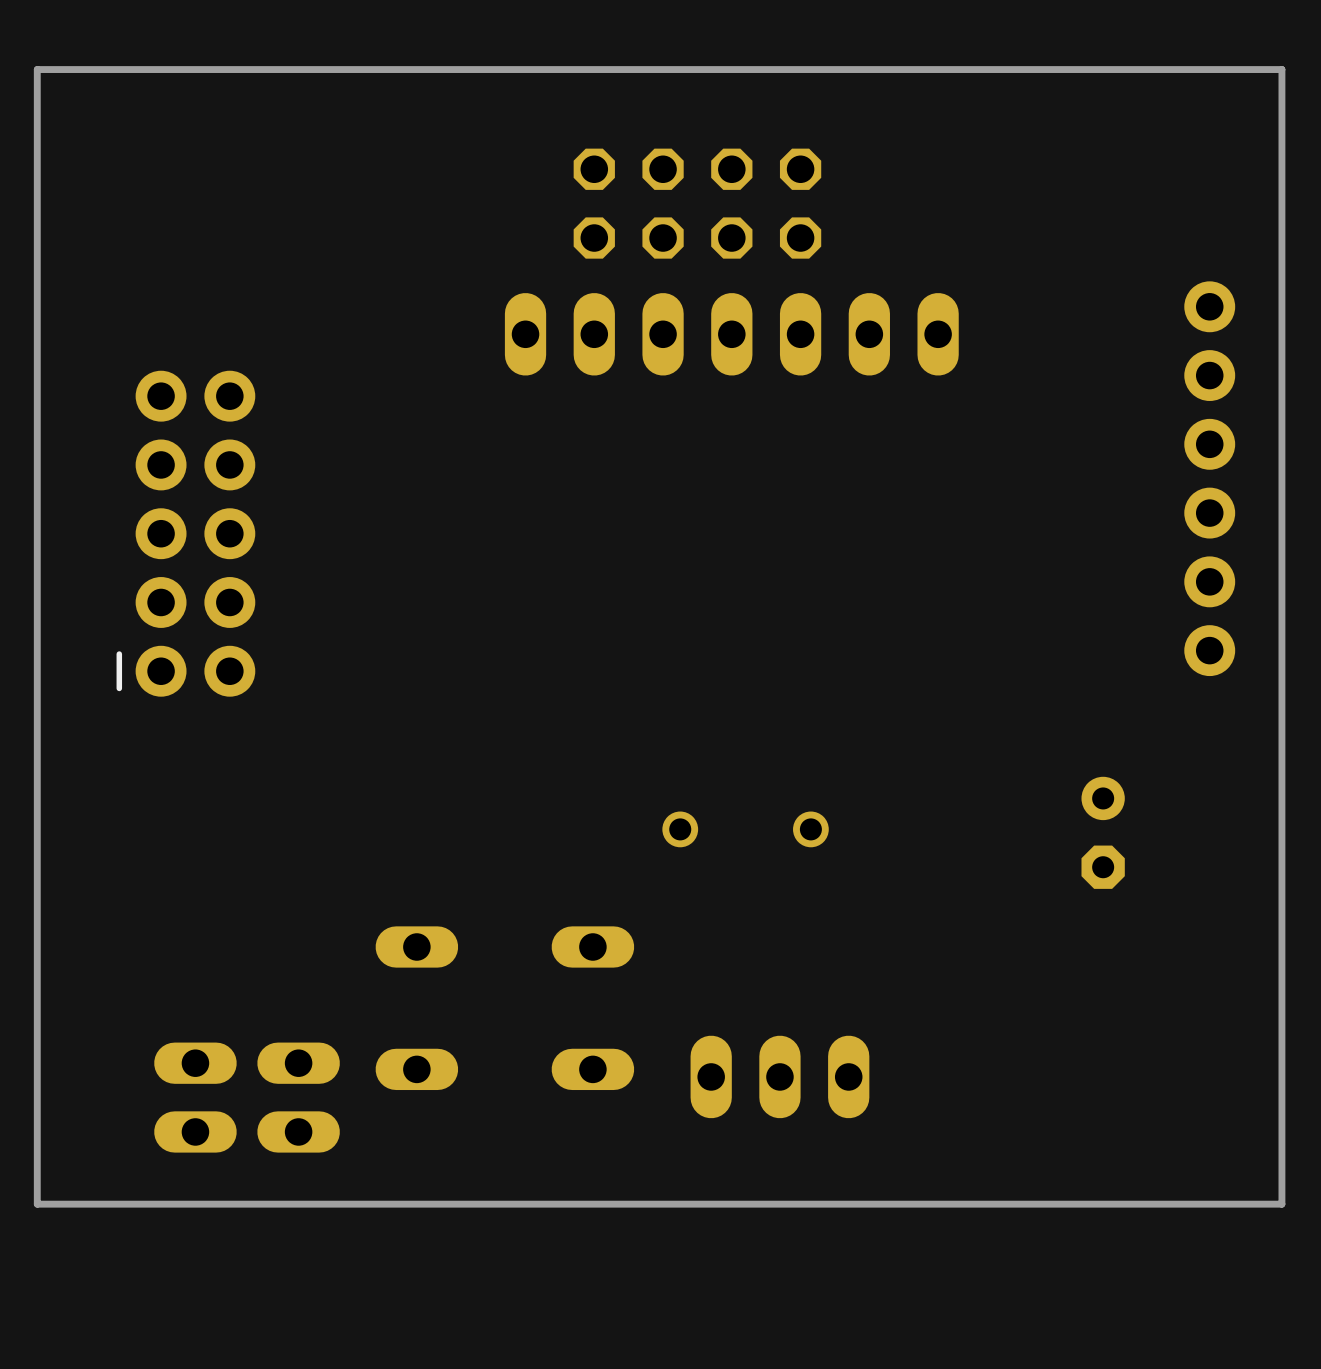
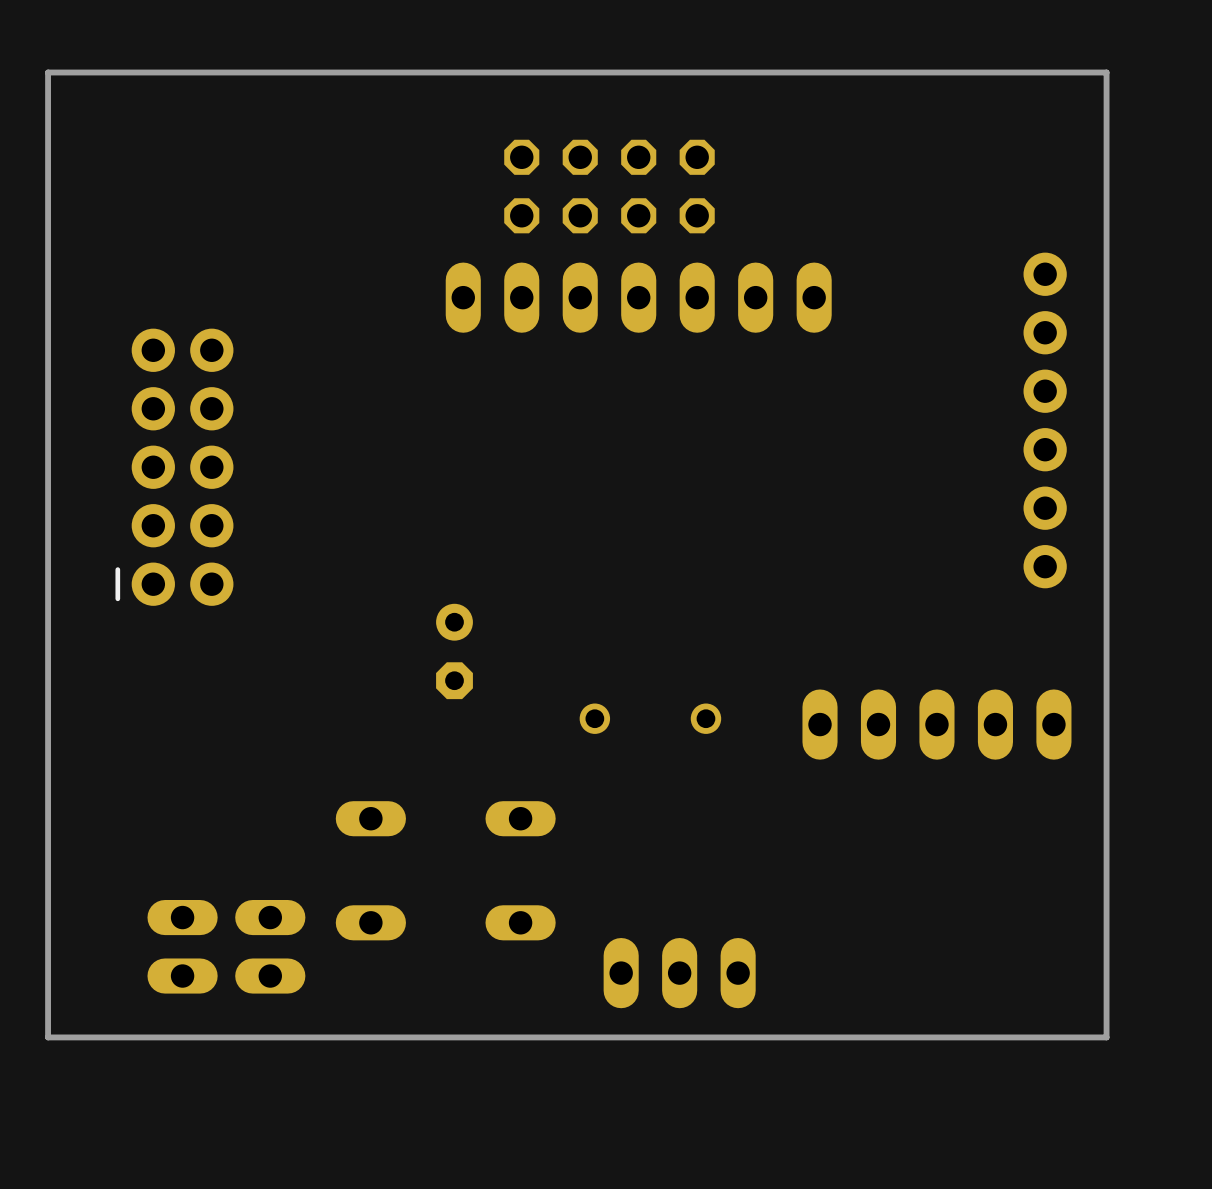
part: none -> (454, 651)
part footprint: [1081, 776, 1125, 889] -> [802, 689, 1072, 760]
part position: (779, 1076) -> (679, 973)

